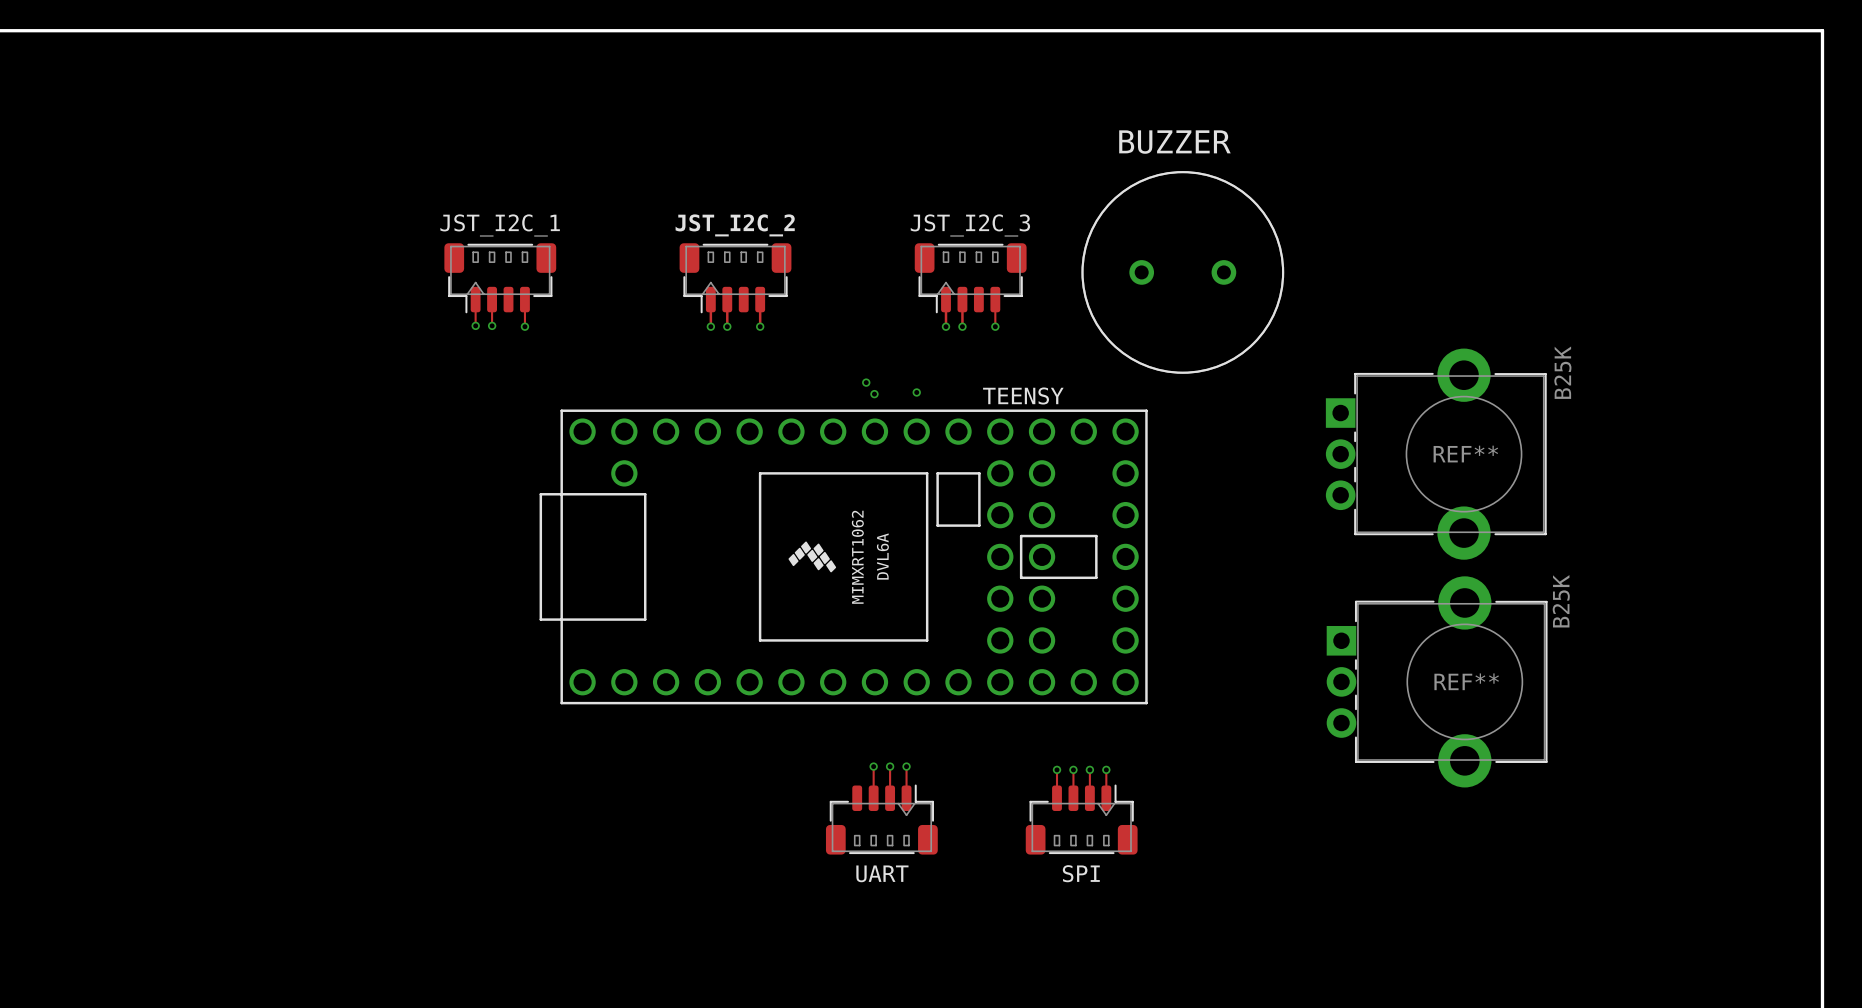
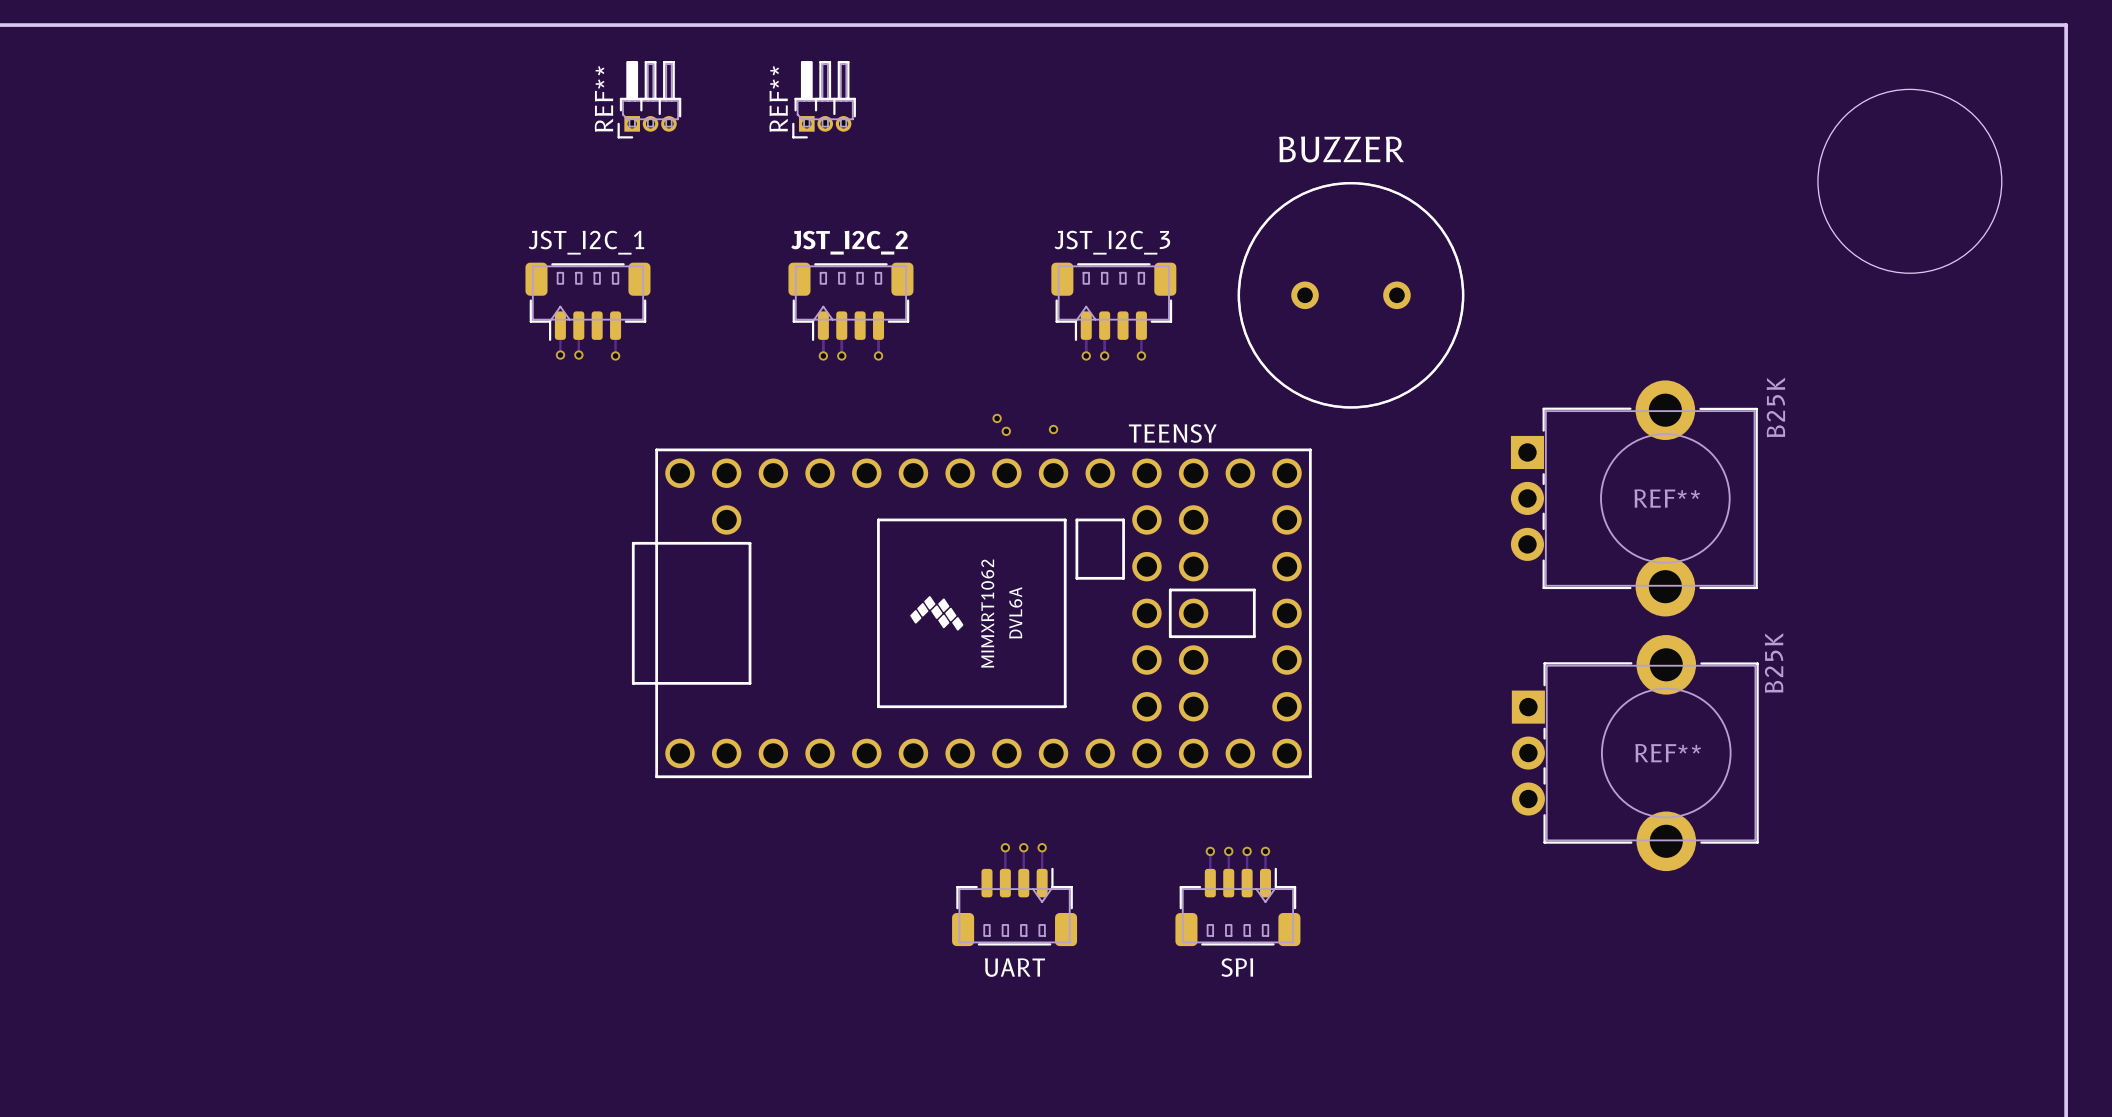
round board edge: none -> [1817, 88, 2003, 274]
REF**: none -> (649, 99)
REF**: none -> (824, 99)

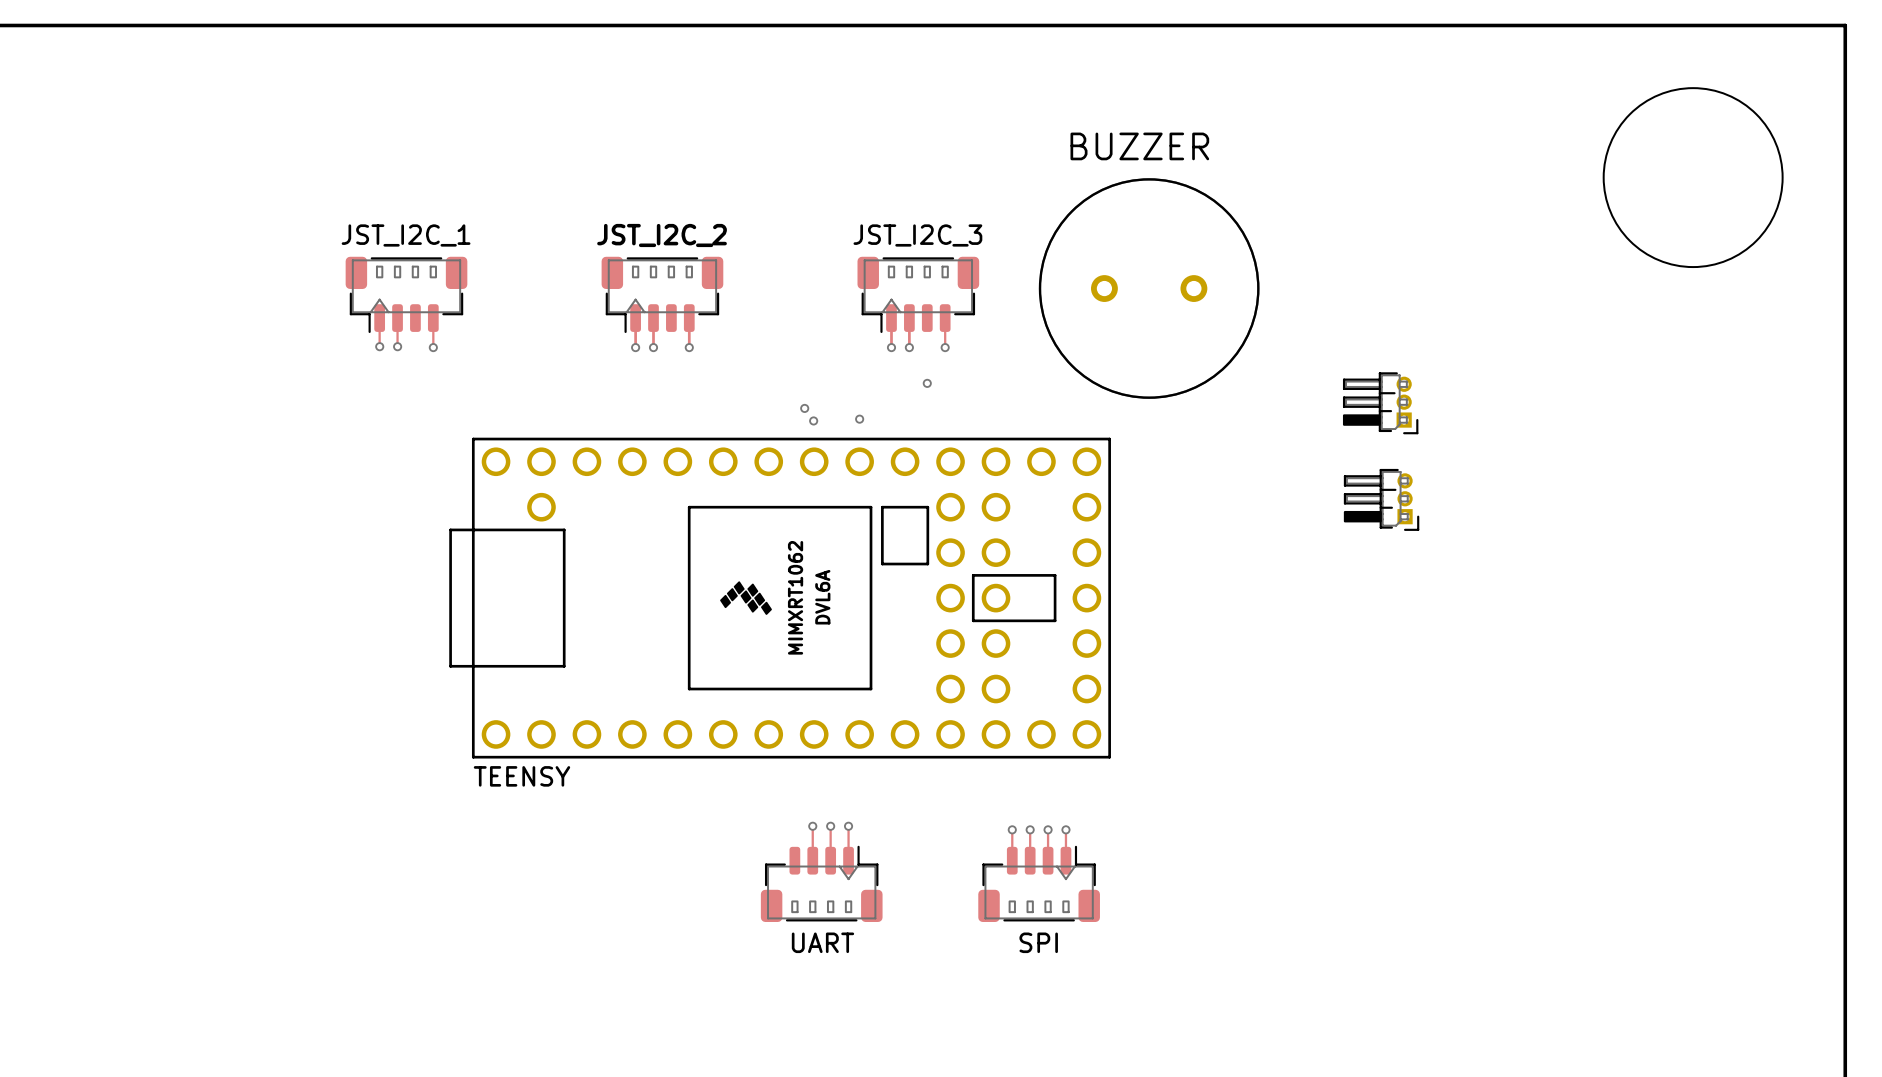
REF**: (649, 99) -> none
REF**: (824, 99) -> none
via: none -> (927, 383)
part: none -> (1380, 403)
TEENSY name position: TEENSY (1172, 433) -> TEENSY (521, 776)
REF**: B25K (1634, 498) -> none
part: none -> (1381, 499)
REF**: B25K (1635, 753) -> none

